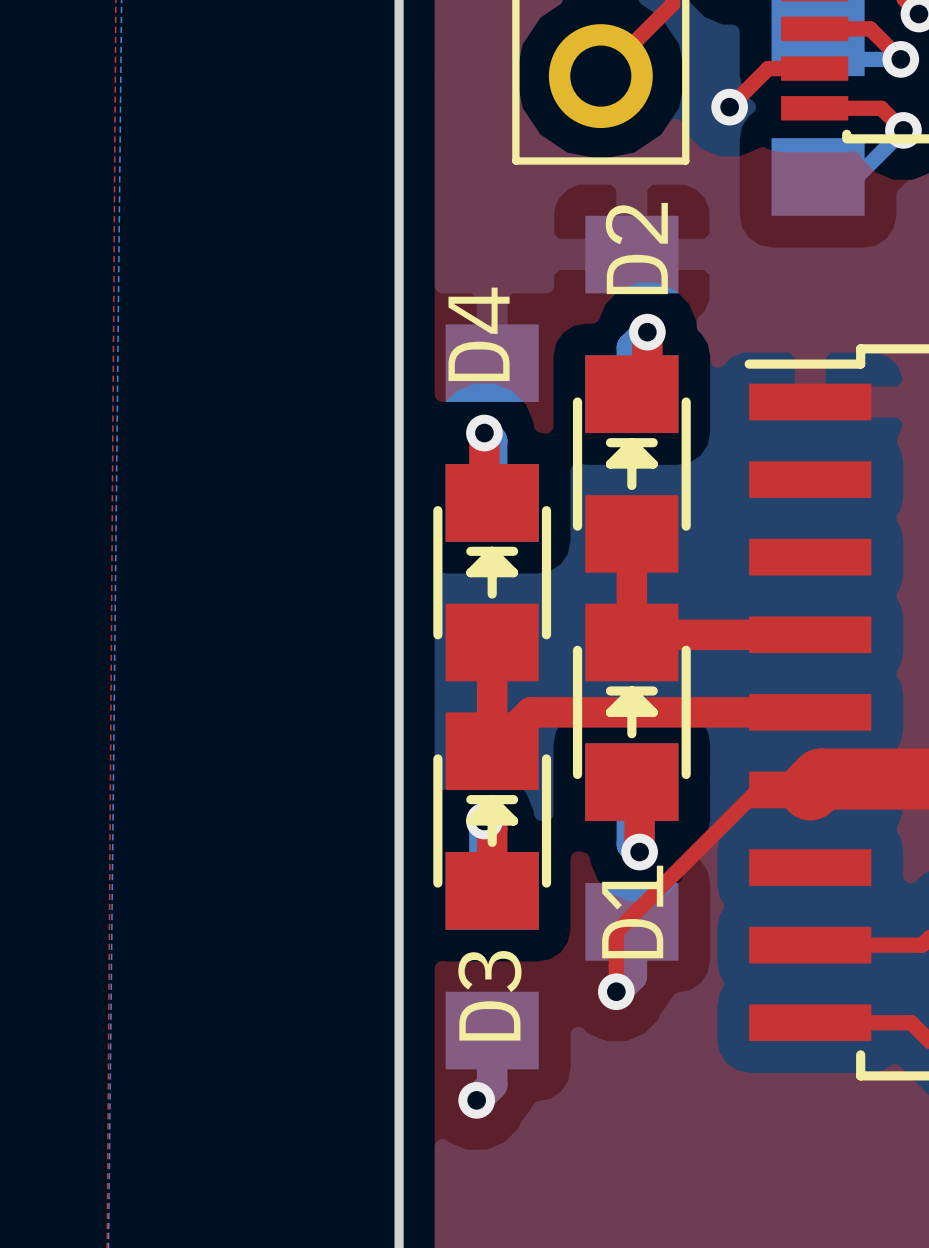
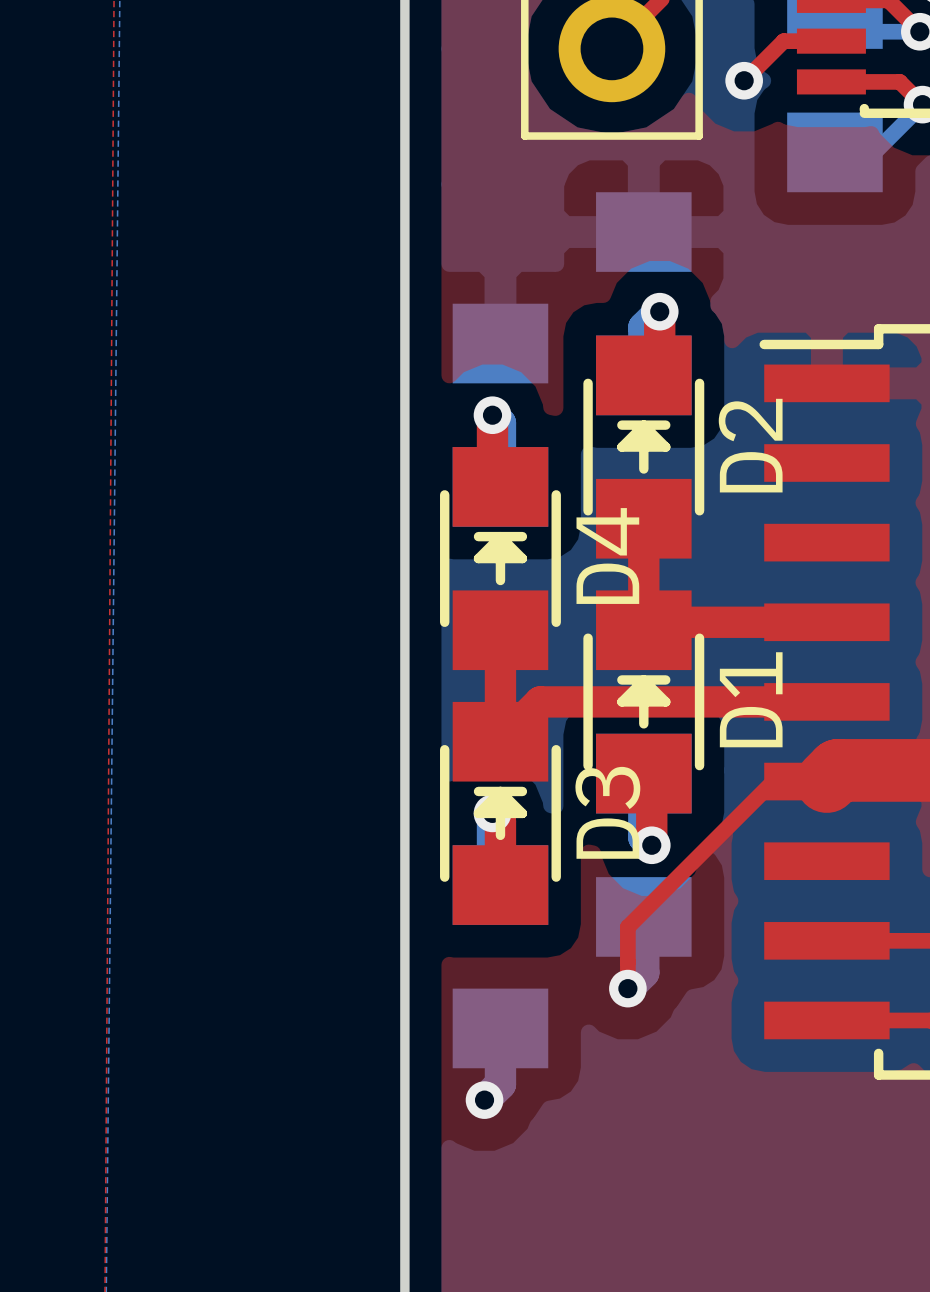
D2 name position: D2 (636, 248) -> D2 (750, 445)
D4 name position: D4 (479, 334) -> D4 (607, 556)
D1 name position: D1 (632, 912) -> D1 (751, 699)
D3 name position: D3 (489, 995) -> D3 (607, 812)

